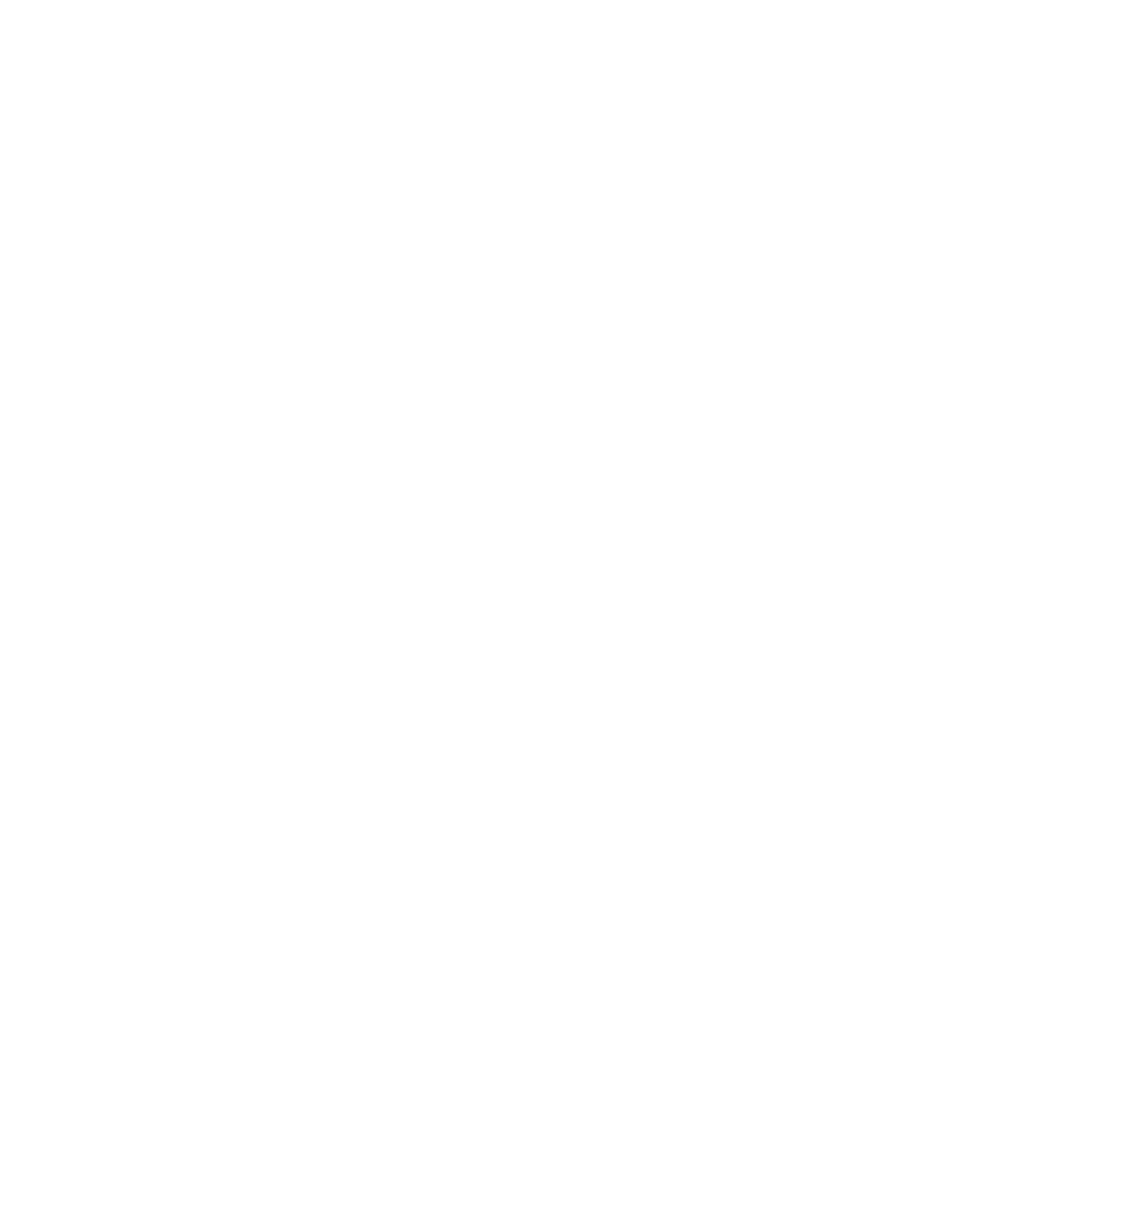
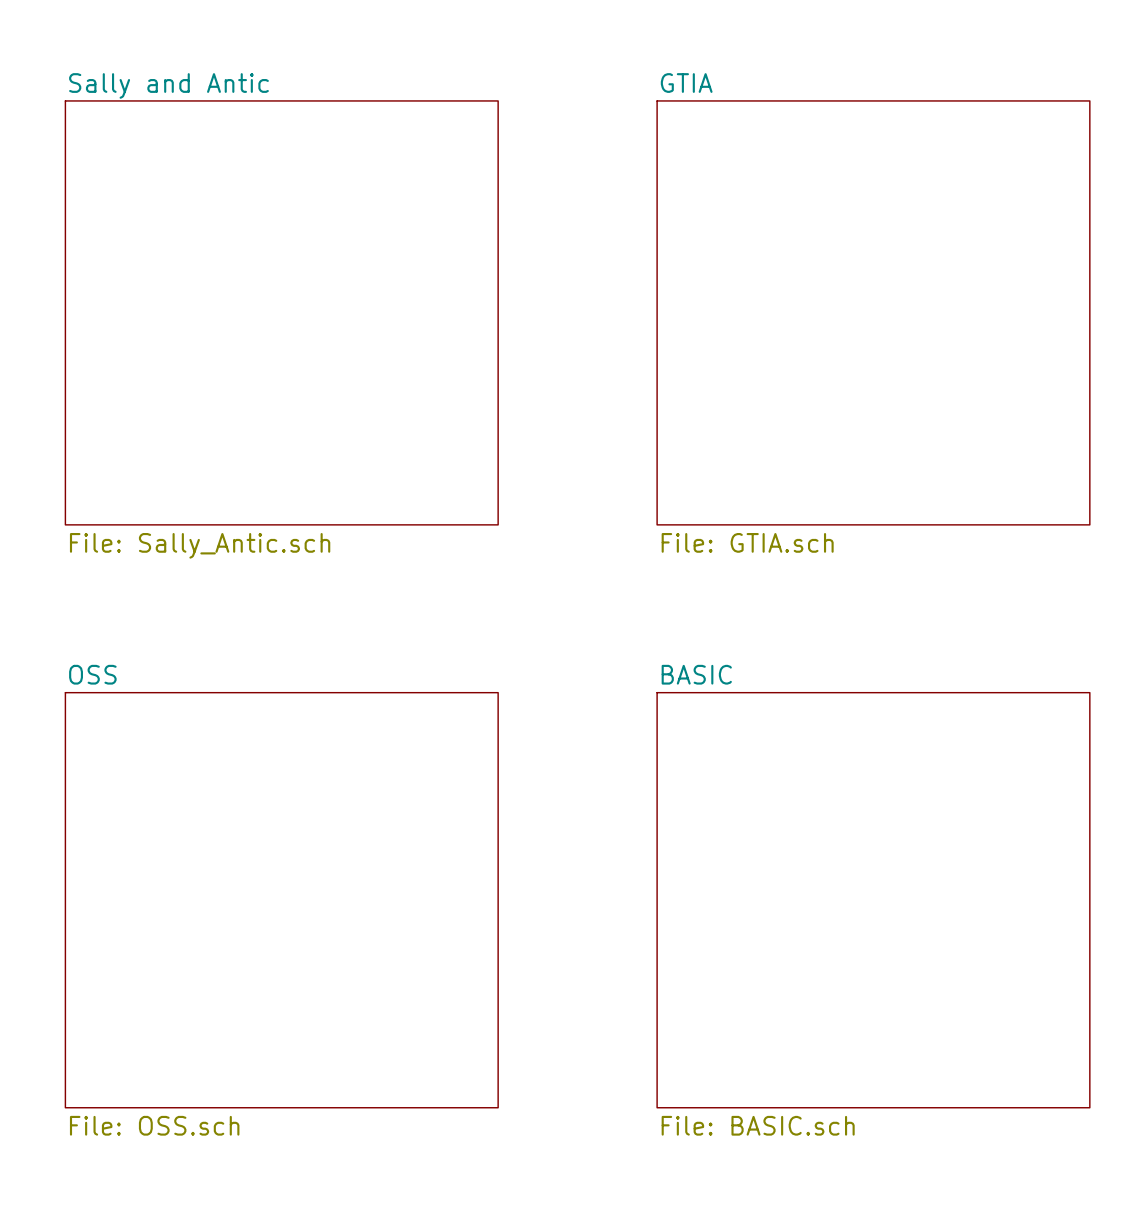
sheet Sally and Antic: none -> File: Sally_Antic.sch (281, 312)
sheet GTIA: none -> File: GTIA.sch (873, 312)
sheet OSS: none -> File: OSS.sch (281, 900)
sheet BASIC: none -> File: BASIC.sch (873, 900)

